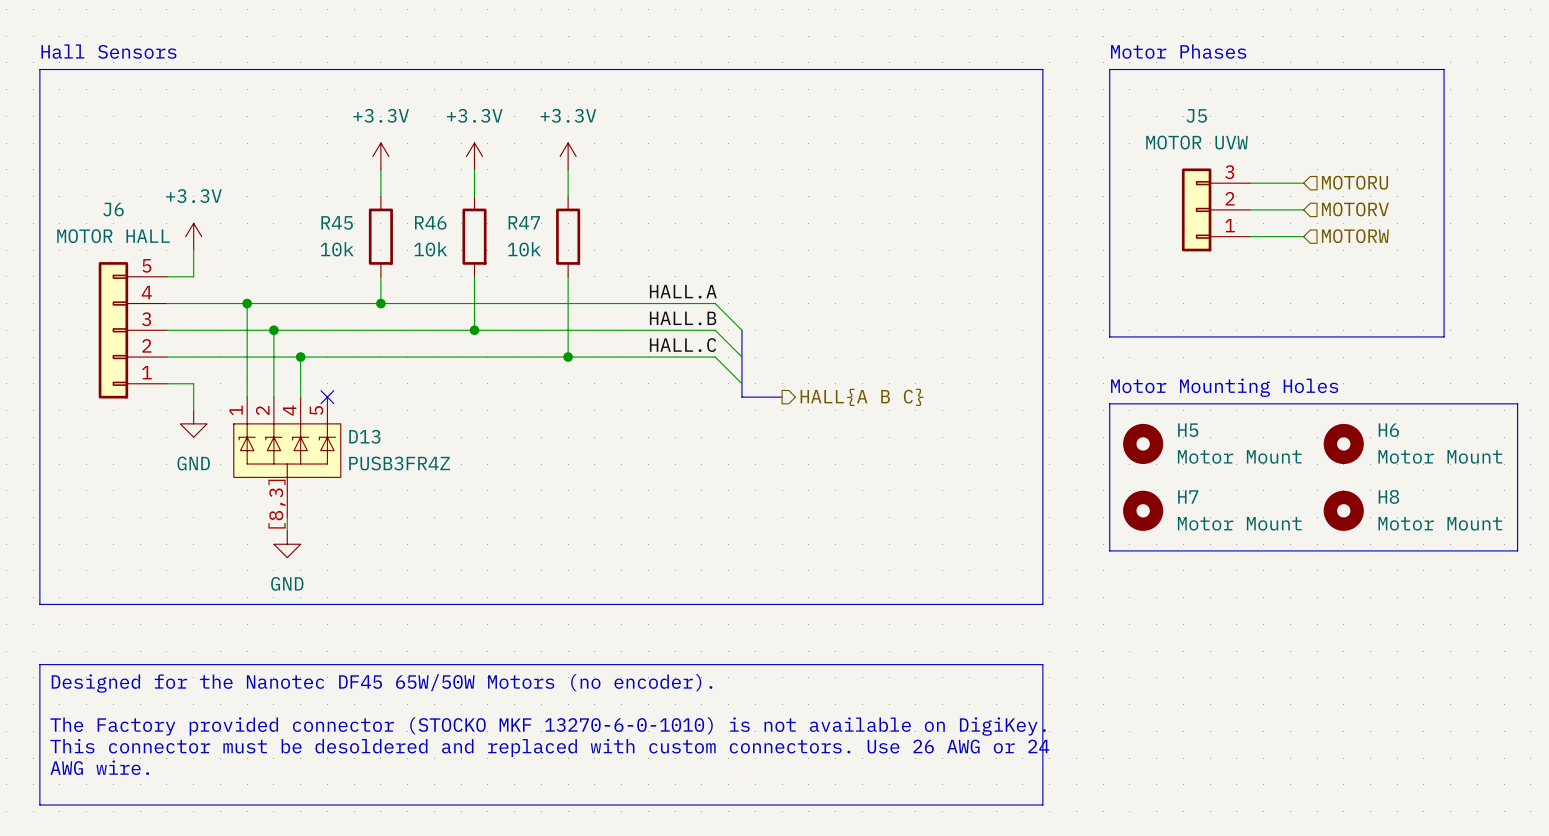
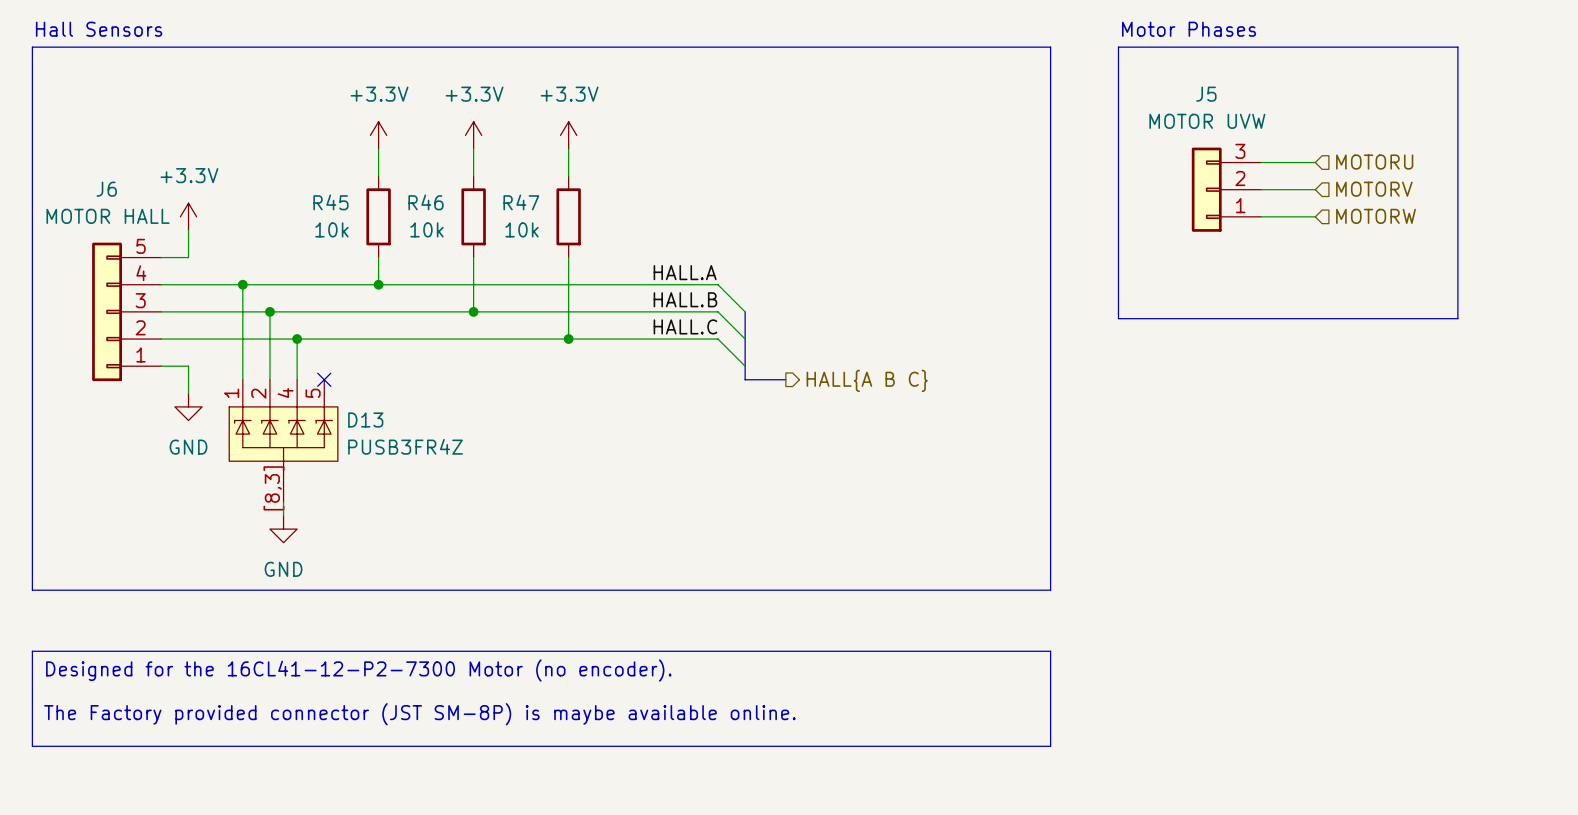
text: Motor Mounting Holes (1224, 387) -> none
line: (1109, 403) (1517, 403) (1517, 550) (1109, 550) (1109, 403) -> none
H5: Motor Mount (1143, 443) -> none
H6: Motor Mount (1343, 443) -> none
H7: Motor Mount (1143, 510) -> none
H8: Motor Mount (1343, 510) -> none
text: Designed for the Nanotec DF45 65W/50W Motors (no encoder). (382, 683) -> Designed for the 16CL41-12-P2-7300 Motor (no encoder). (358, 670)
text: The Factory provided connector (STOCKO MKF 13270-6-0-1010) is not available on DigiKey. (548, 726) -> The Factory provided connector (JST SM-8P) is maybe available online. (419, 714)
text: This connector must be desoldered and replaced with custom connectors. Use 26 AWG or 24 (549, 747) -> none
line: (39, 758) (39, 805) (1042, 805) (1042, 758) -> (32, 746) (1050, 746)
text: AWG wire. (99, 767) -> none

